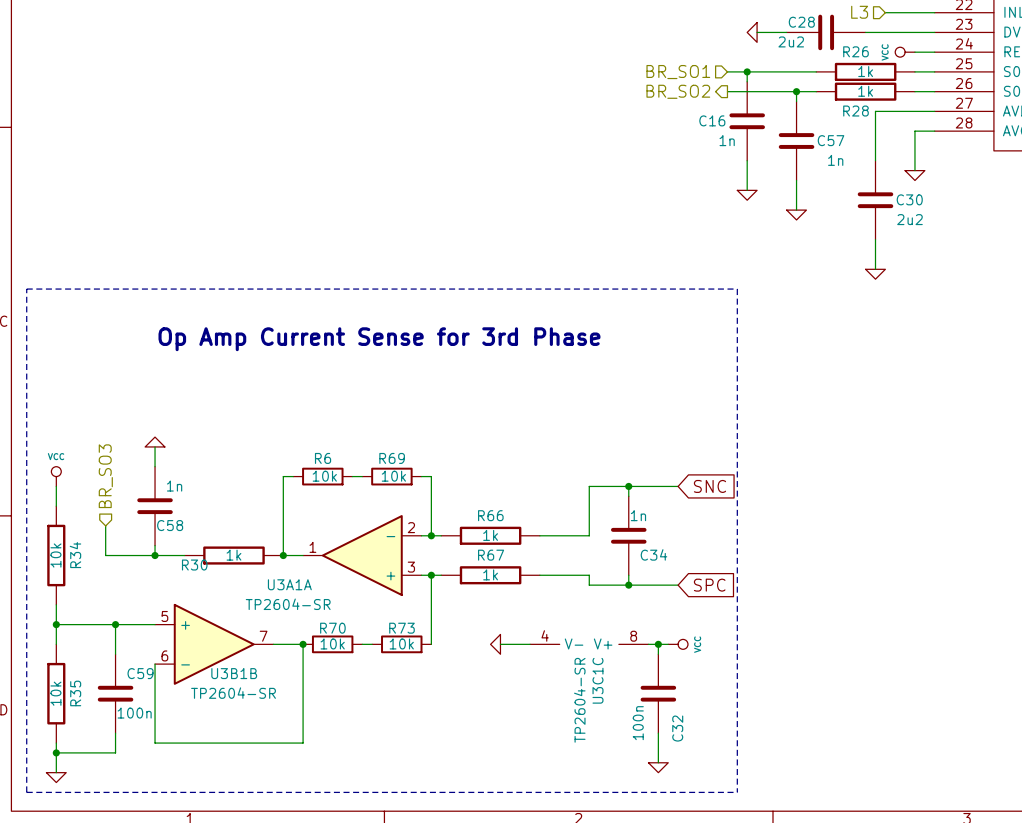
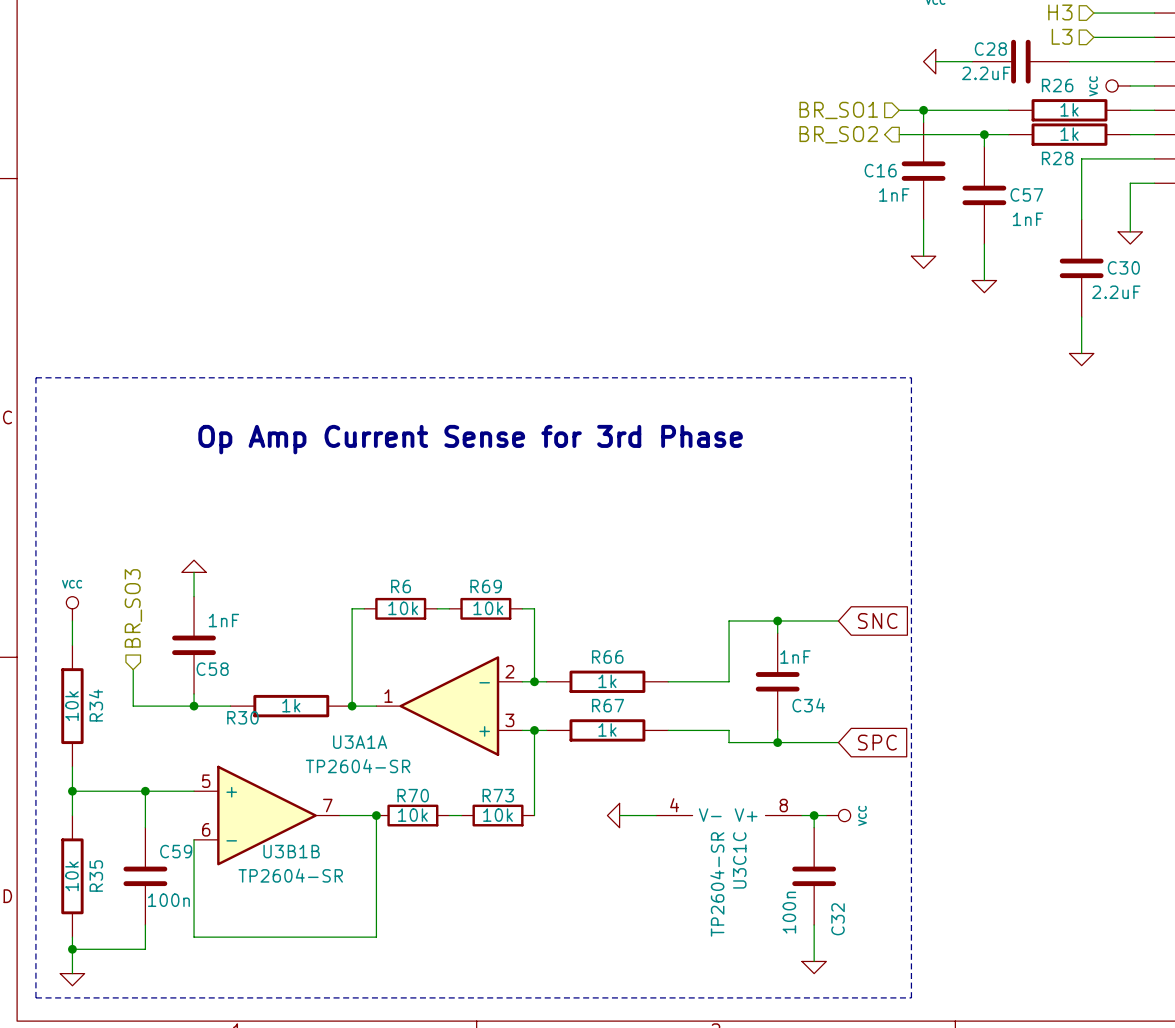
C28 value: 2u2 (791, 41) -> 2.2uF (986, 73)
C16 value: 1n (727, 140) -> 1nF (894, 194)
C57 value: 1n (835, 160) -> 1nF (1028, 219)
C30 value: 2u2 (909, 219) -> 2.2uF (1116, 292)
C58 value: 1n (174, 486) -> 1nF (223, 620)
C34 value: 1n (638, 515) -> 1nF (795, 657)

